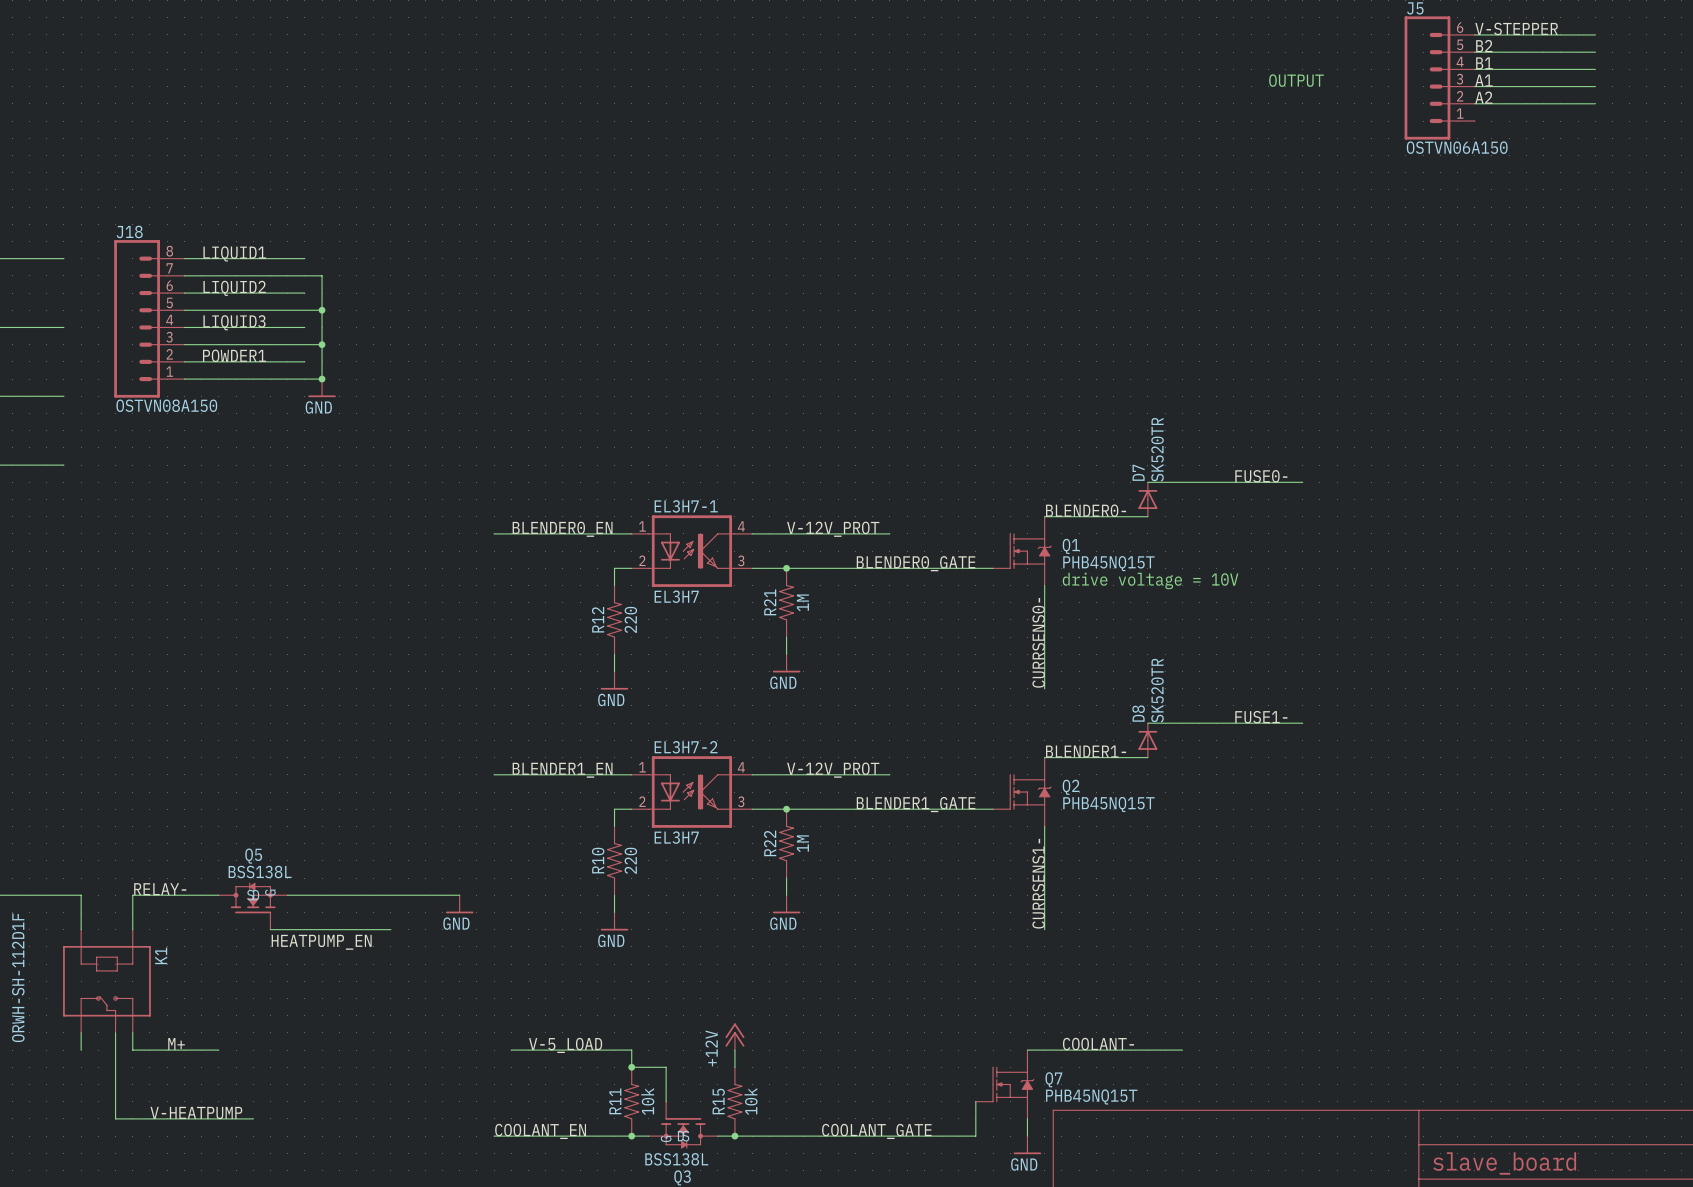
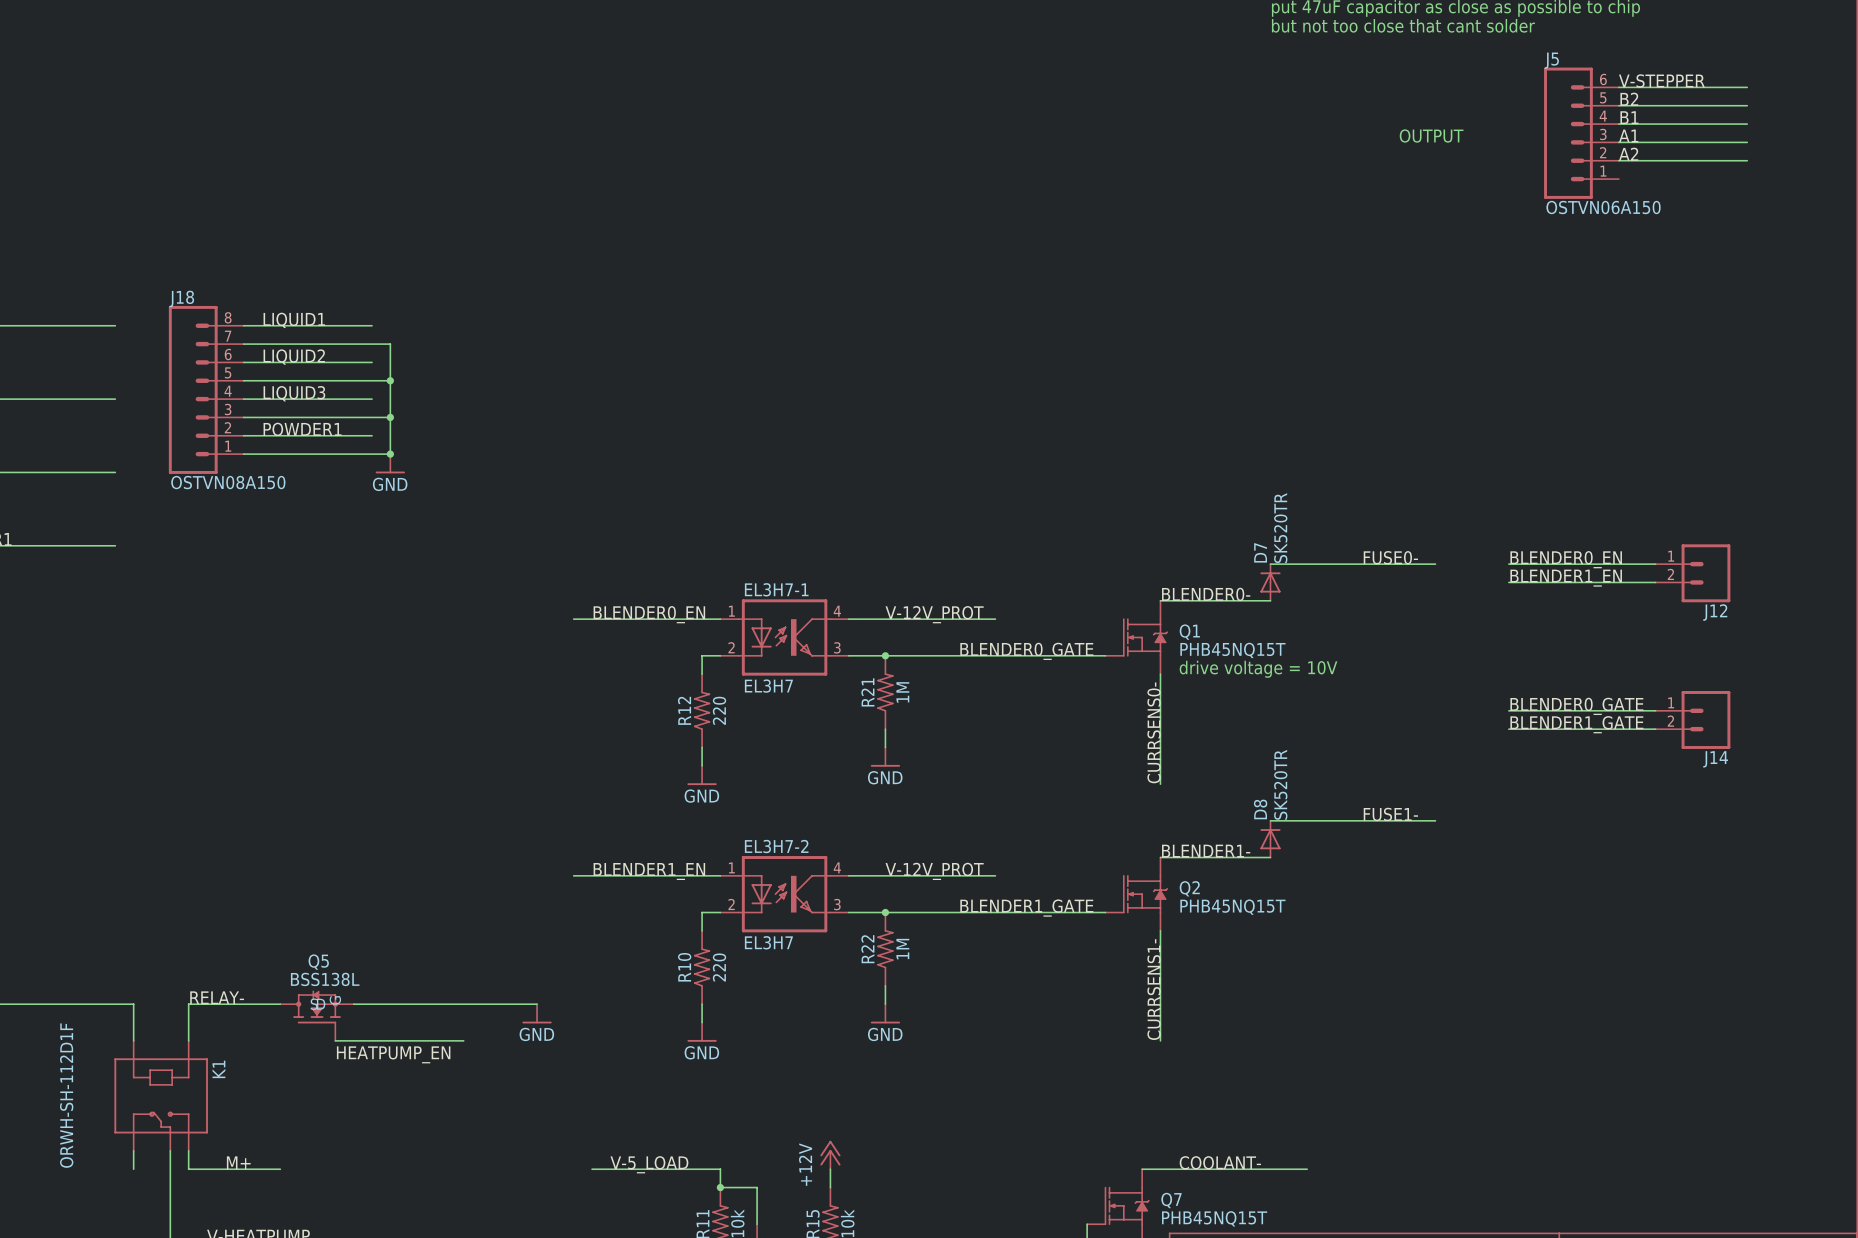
label: none -> BLENDER0_EN (1566, 559)
wire: none -> (1508, 564) (1655, 564)
J12: none -> (1692, 573)
label: none -> BLENDER1_EN (1566, 578)
wire: none -> (1508, 582) (1655, 582)
label: none -> BLENDER0_GATE (1576, 706)
wire: none -> (1508, 710) (1655, 710)
J14: none -> (1692, 719)
label: none -> BLENDER1_GATE (1576, 724)
wire: none -> (1508, 729) (1655, 729)

